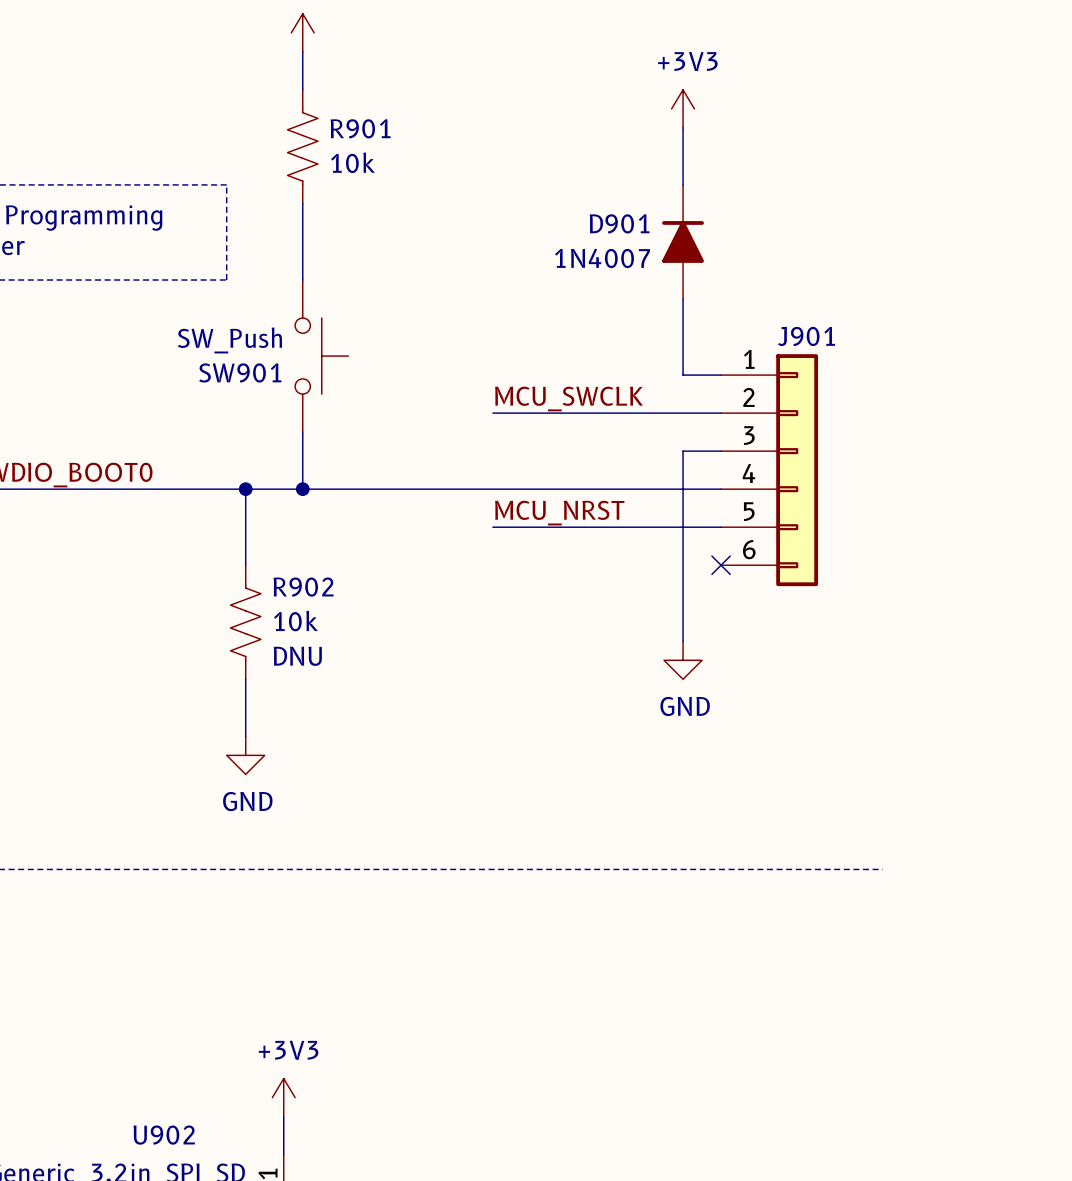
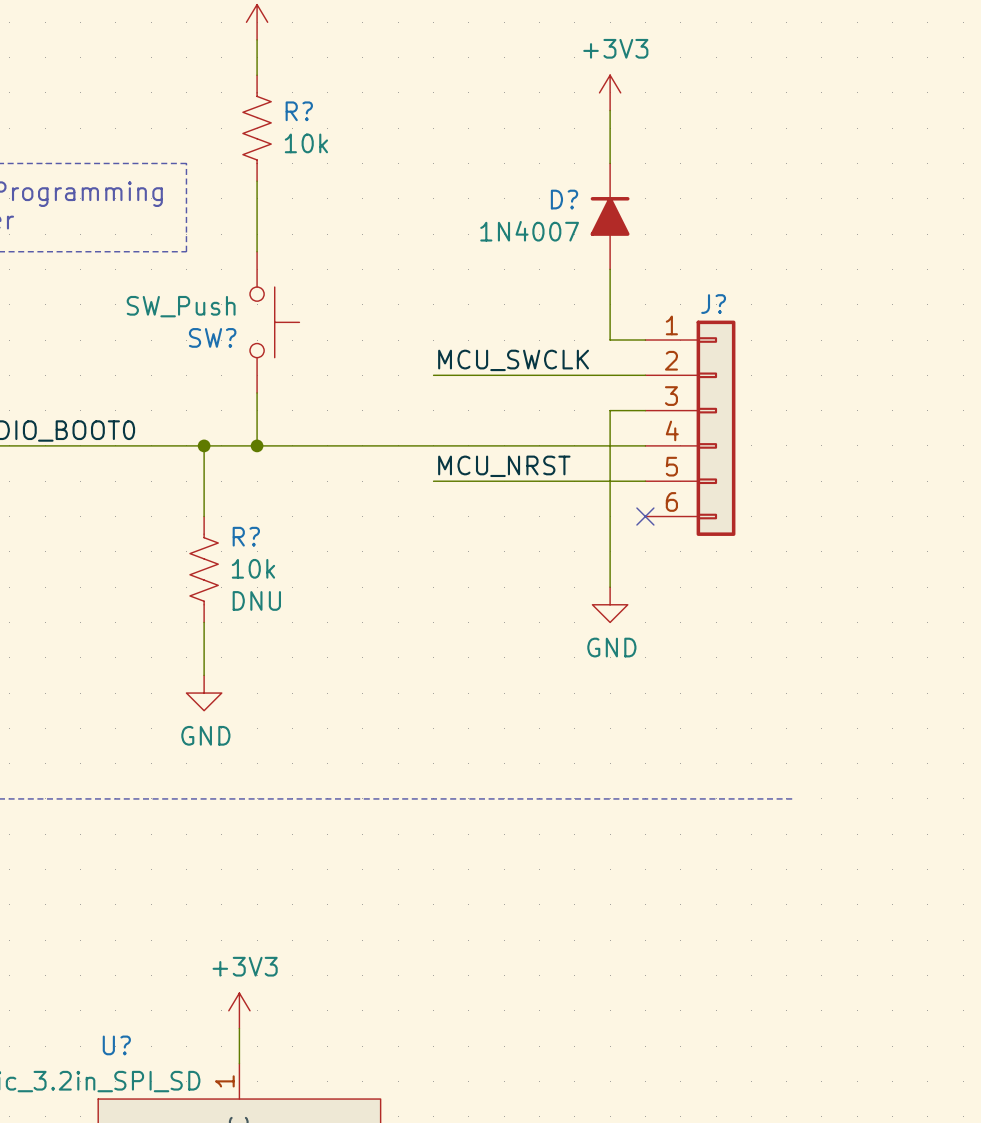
R901 name: R901 (360, 128) -> R? (299, 111)
D901 name: D901 (619, 223) -> D? (564, 199)
J901 name: J901 (806, 336) -> J? (713, 304)
SW901 name: SW901 (240, 372) -> SW? (212, 337)
R902 name: R902 (303, 587) -> R? (246, 536)
U902 name: U902 (164, 1135) -> U? (116, 1045)

